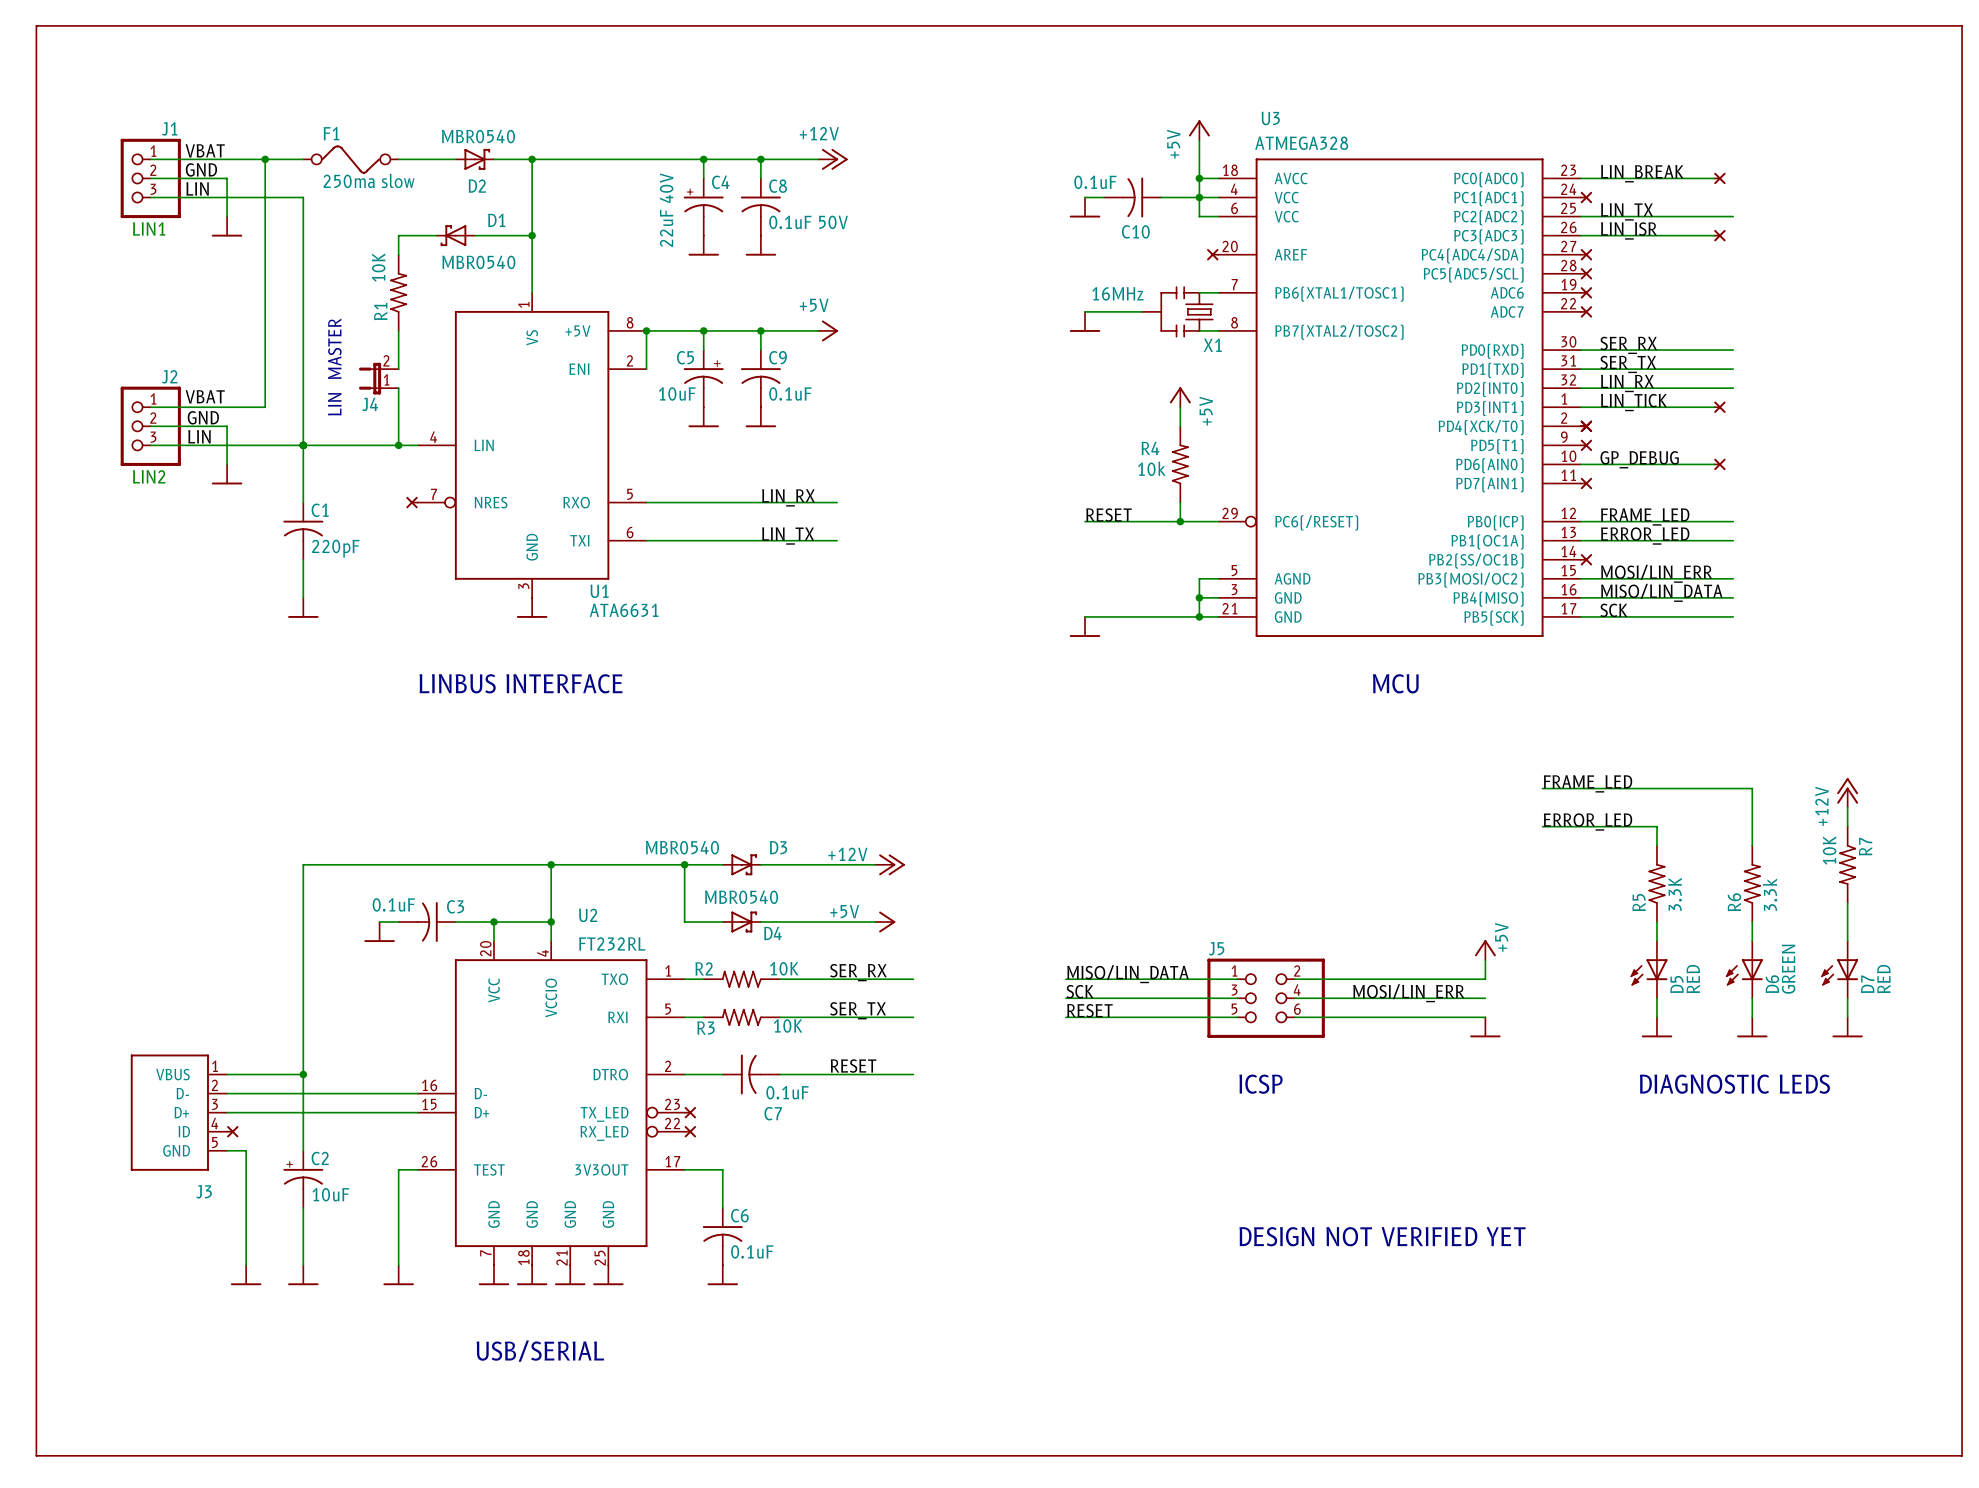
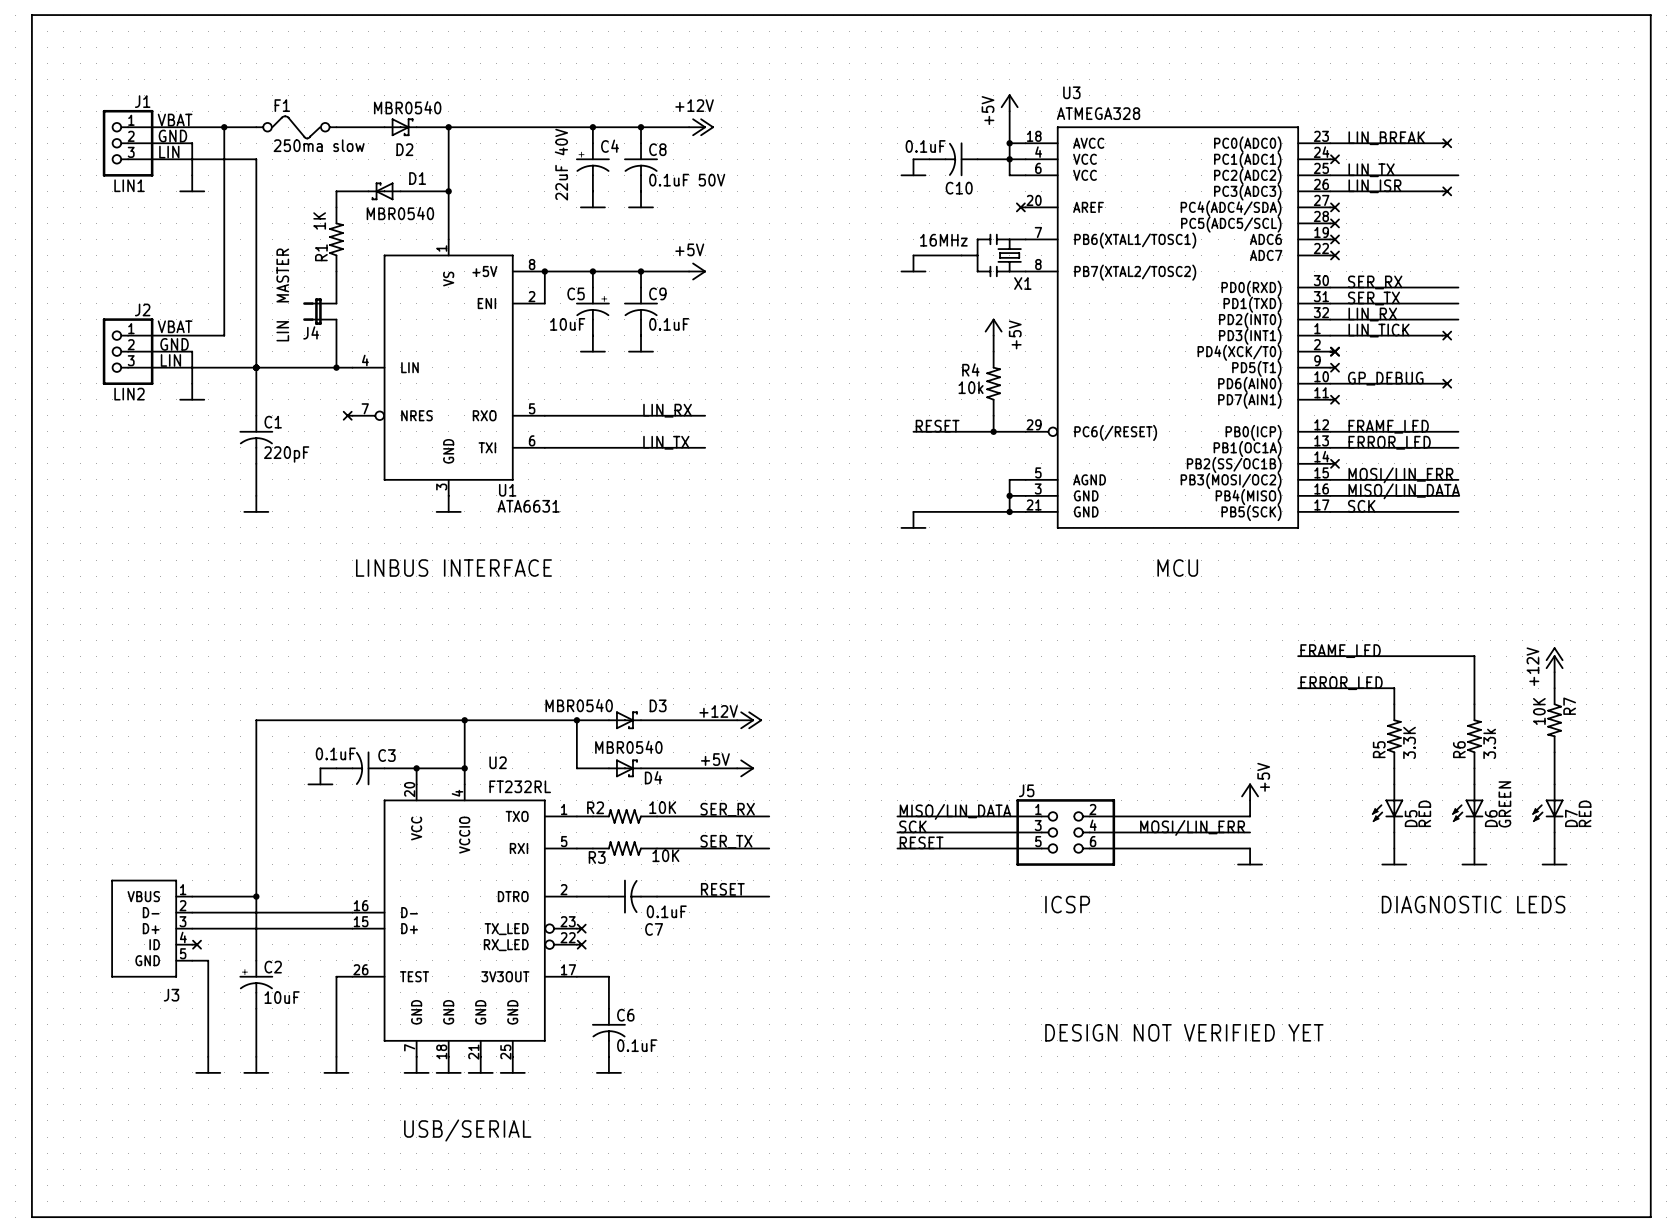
R1 value: 10K (378, 267) -> 1K (319, 220)
J4 pin number: 2 (386, 360) -> none
J4 pin number: 1 (386, 379) -> none

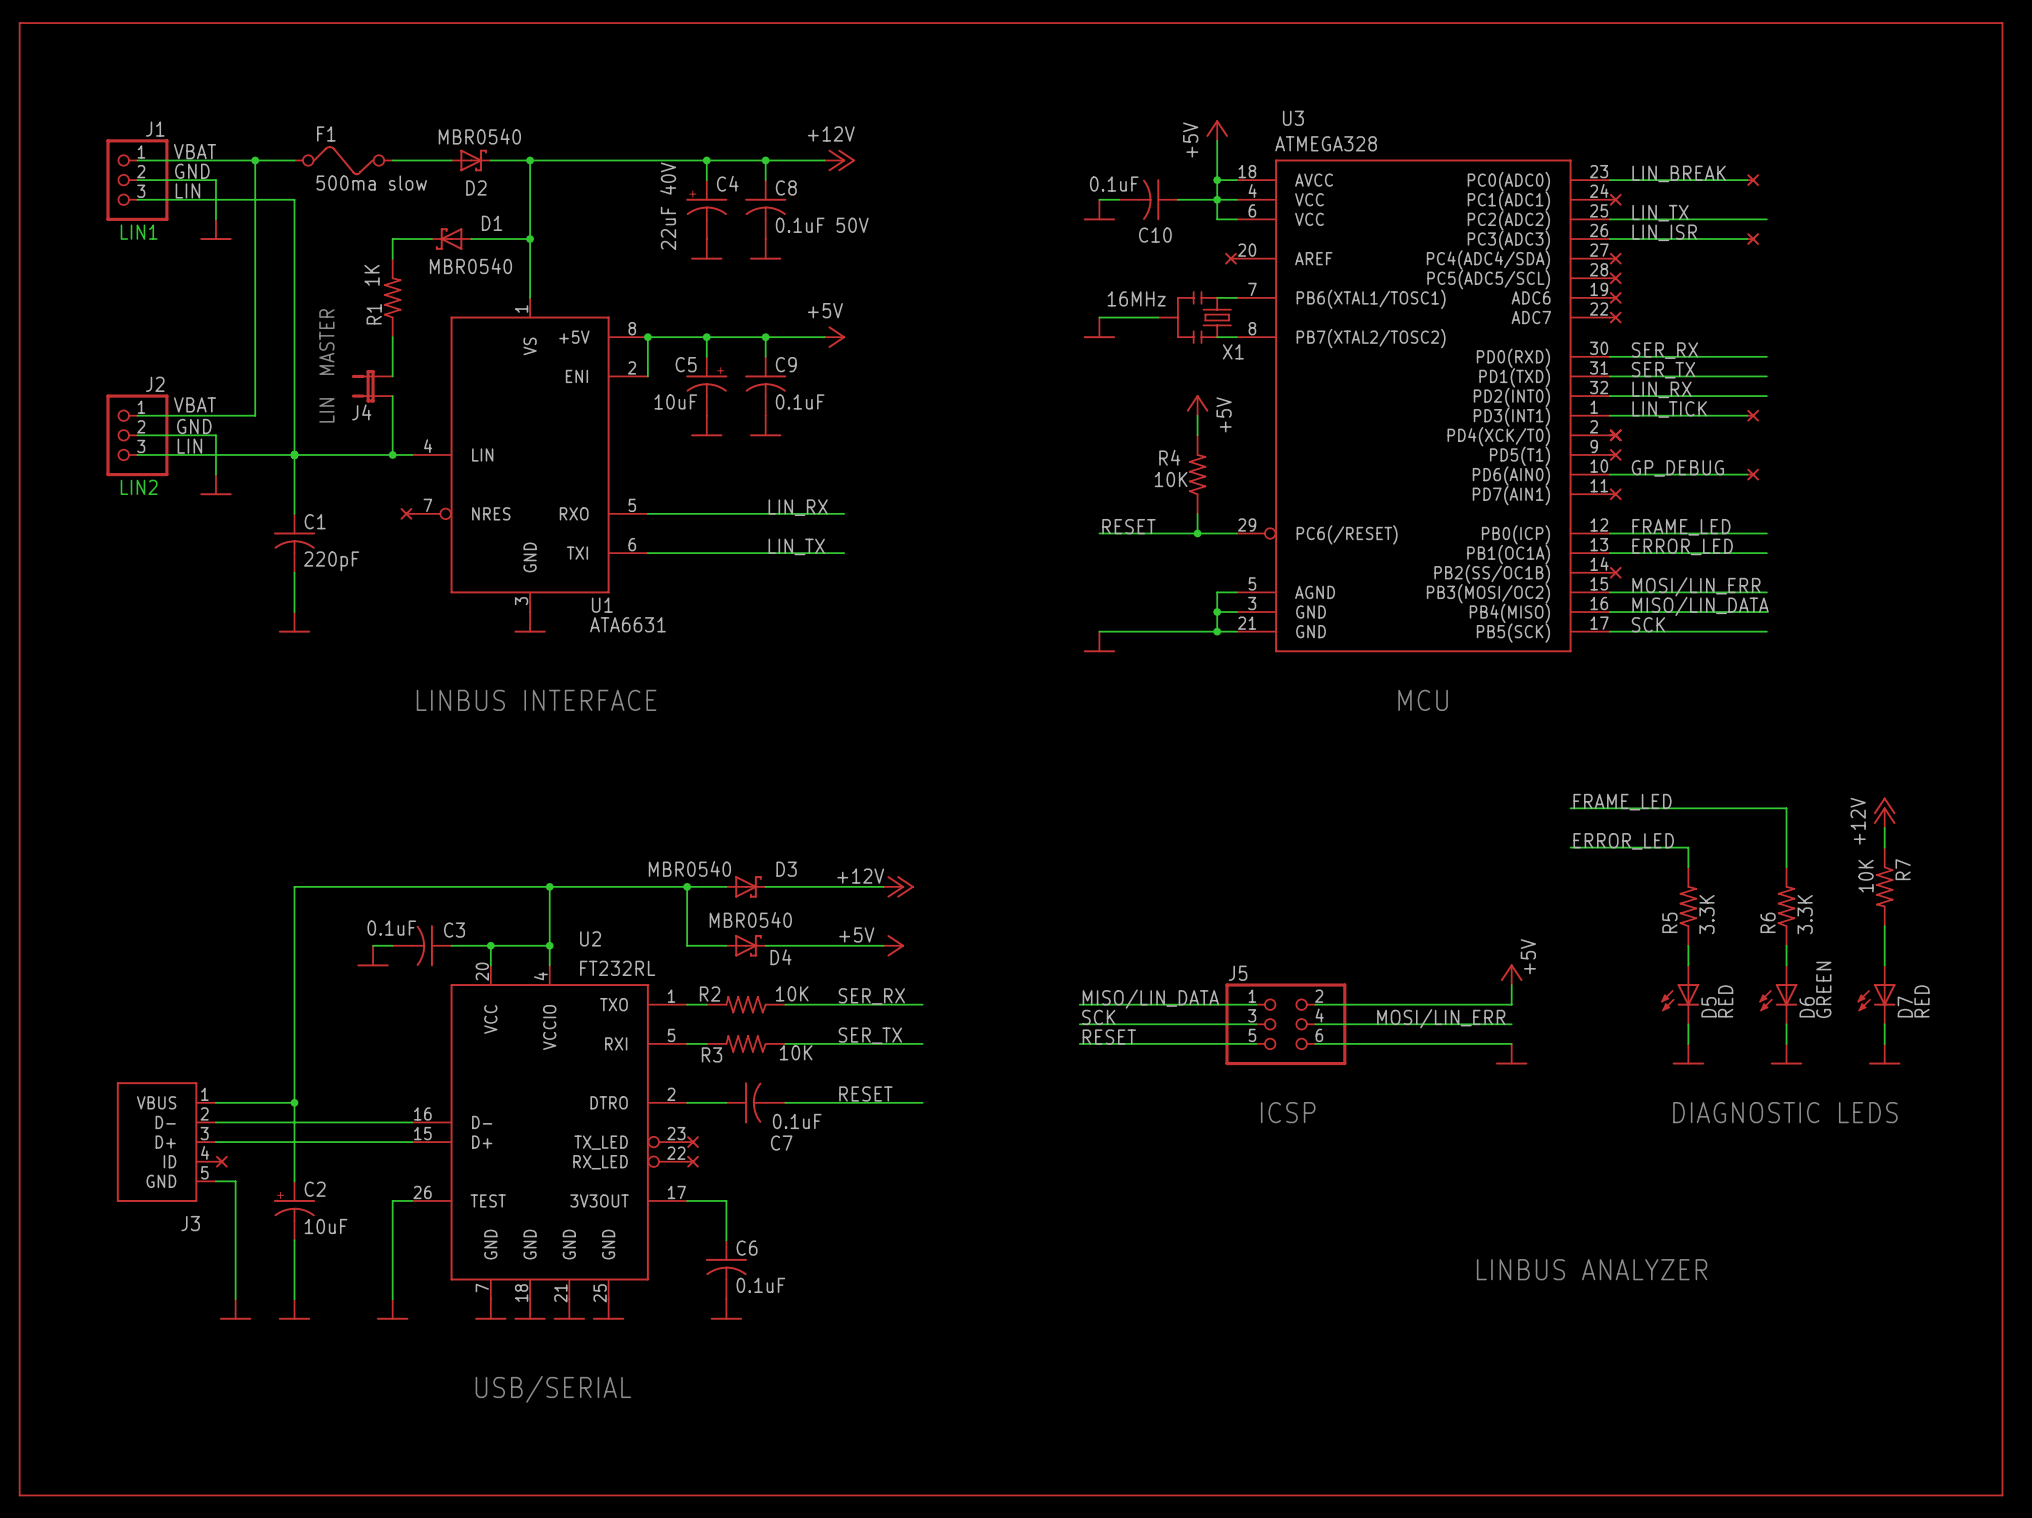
F1 value: 250ma slow (319, 145) -> 500ma slow (371, 183)
R4 value: 10k (971, 387) -> 10K (1171, 479)
R6 value: 3.3k (1489, 743) -> 3.3K (1805, 914)
text: DESIGN NOT VERIFIED YET (1184, 1032) -> none
text: none -> LINBUS ANALYZER (1592, 1269)

